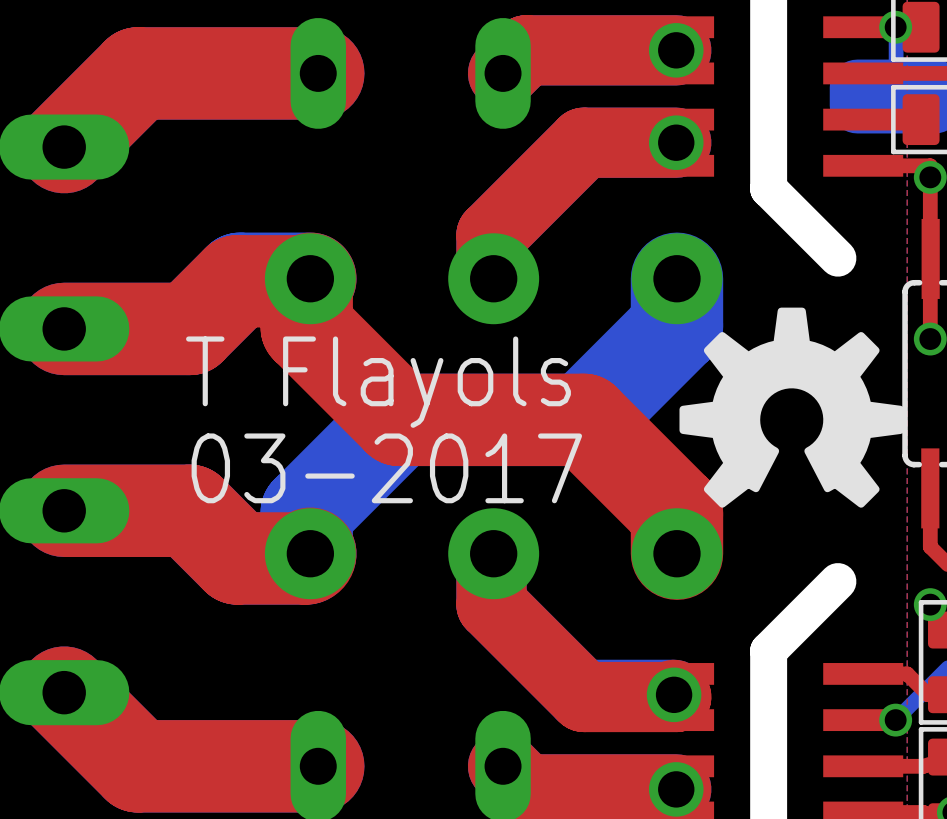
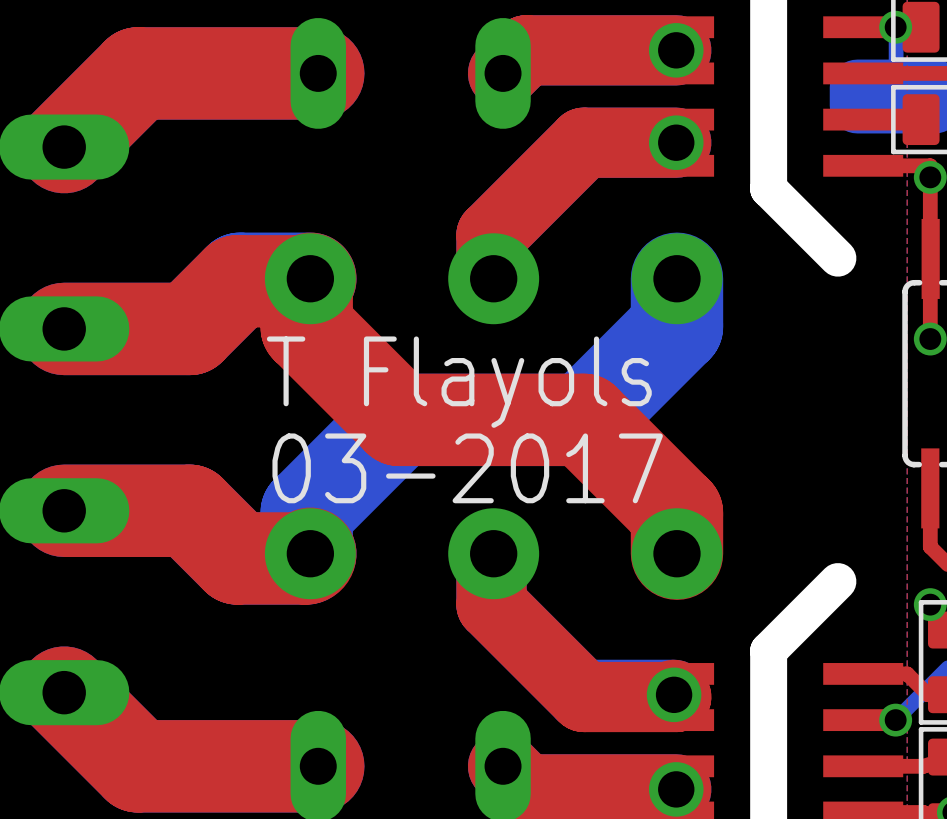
drawing: [679, 307, 904, 508] -> none
text position: T Flayols (378, 382) -> T Flayols (459, 382)
text position: 03-2017 (386, 468) -> 03-2017 (467, 468)

